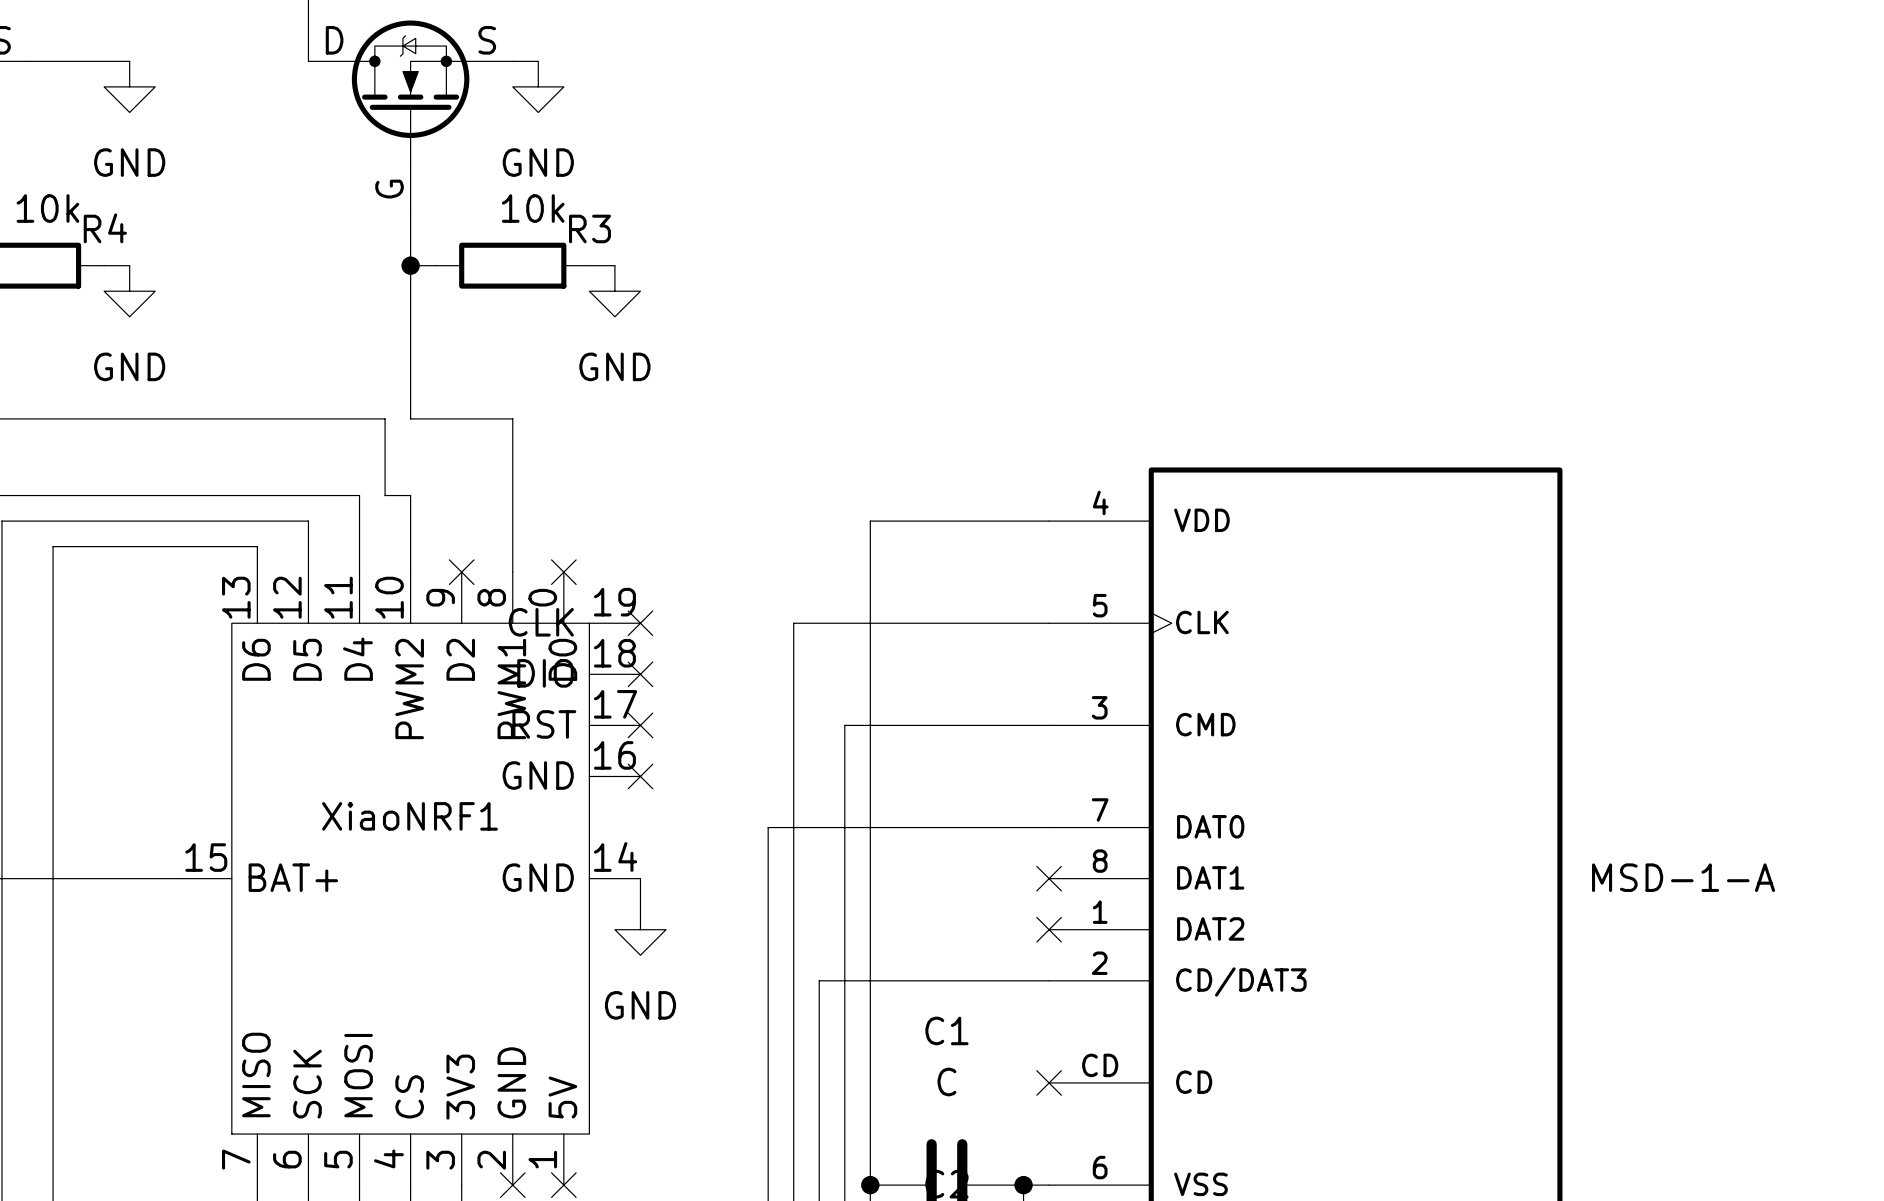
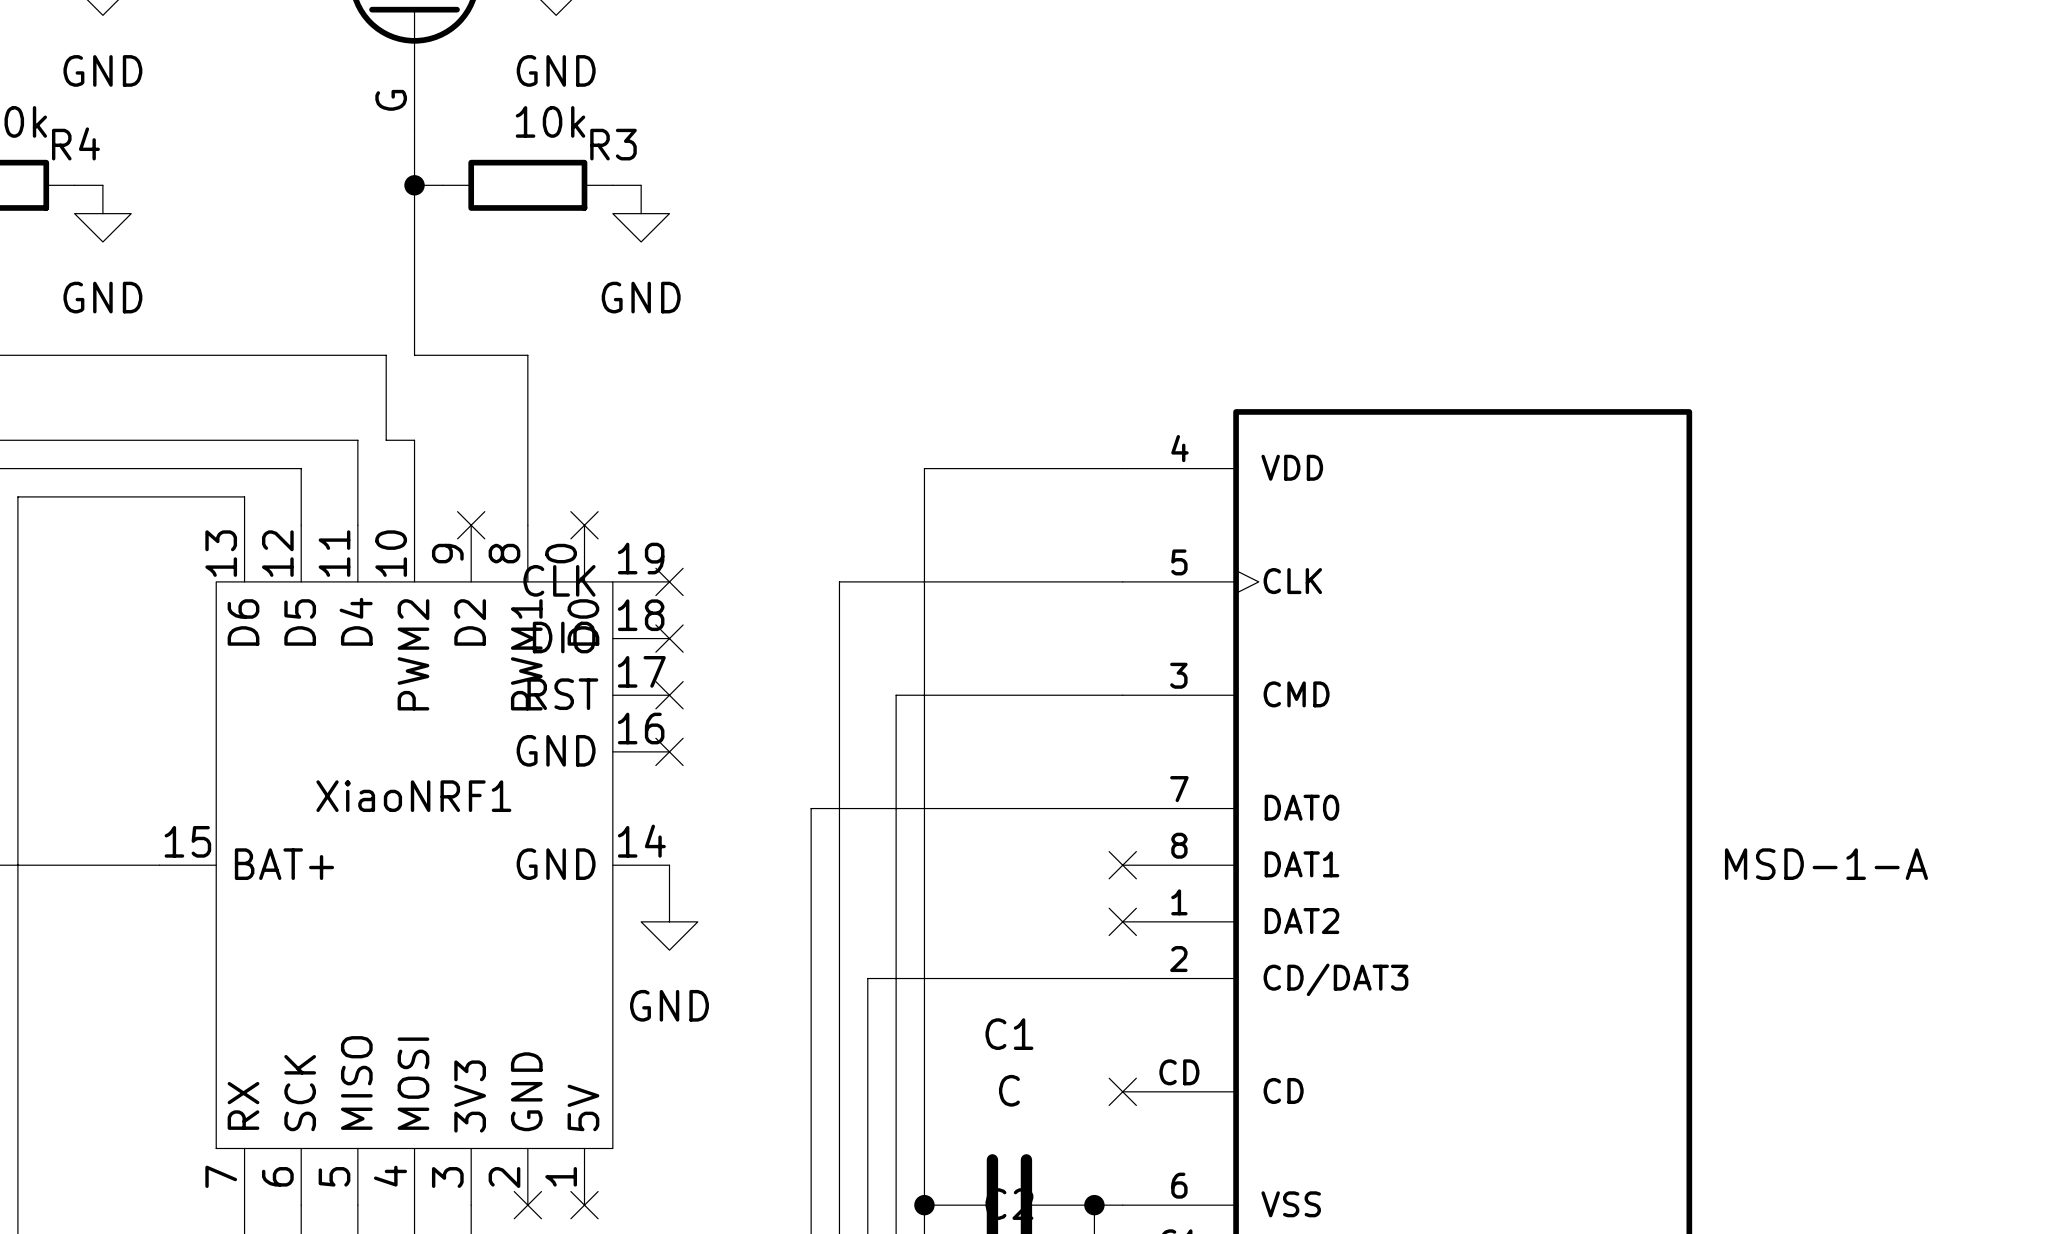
XiaoNRF1 pin name: MISO (256, 1074) -> RX (243, 1105)
XiaoNRF1 pin name: MOSI (358, 1075) -> MISO (356, 1082)
XiaoNRF1 pin name: CS (409, 1096) -> MOSI (413, 1083)

